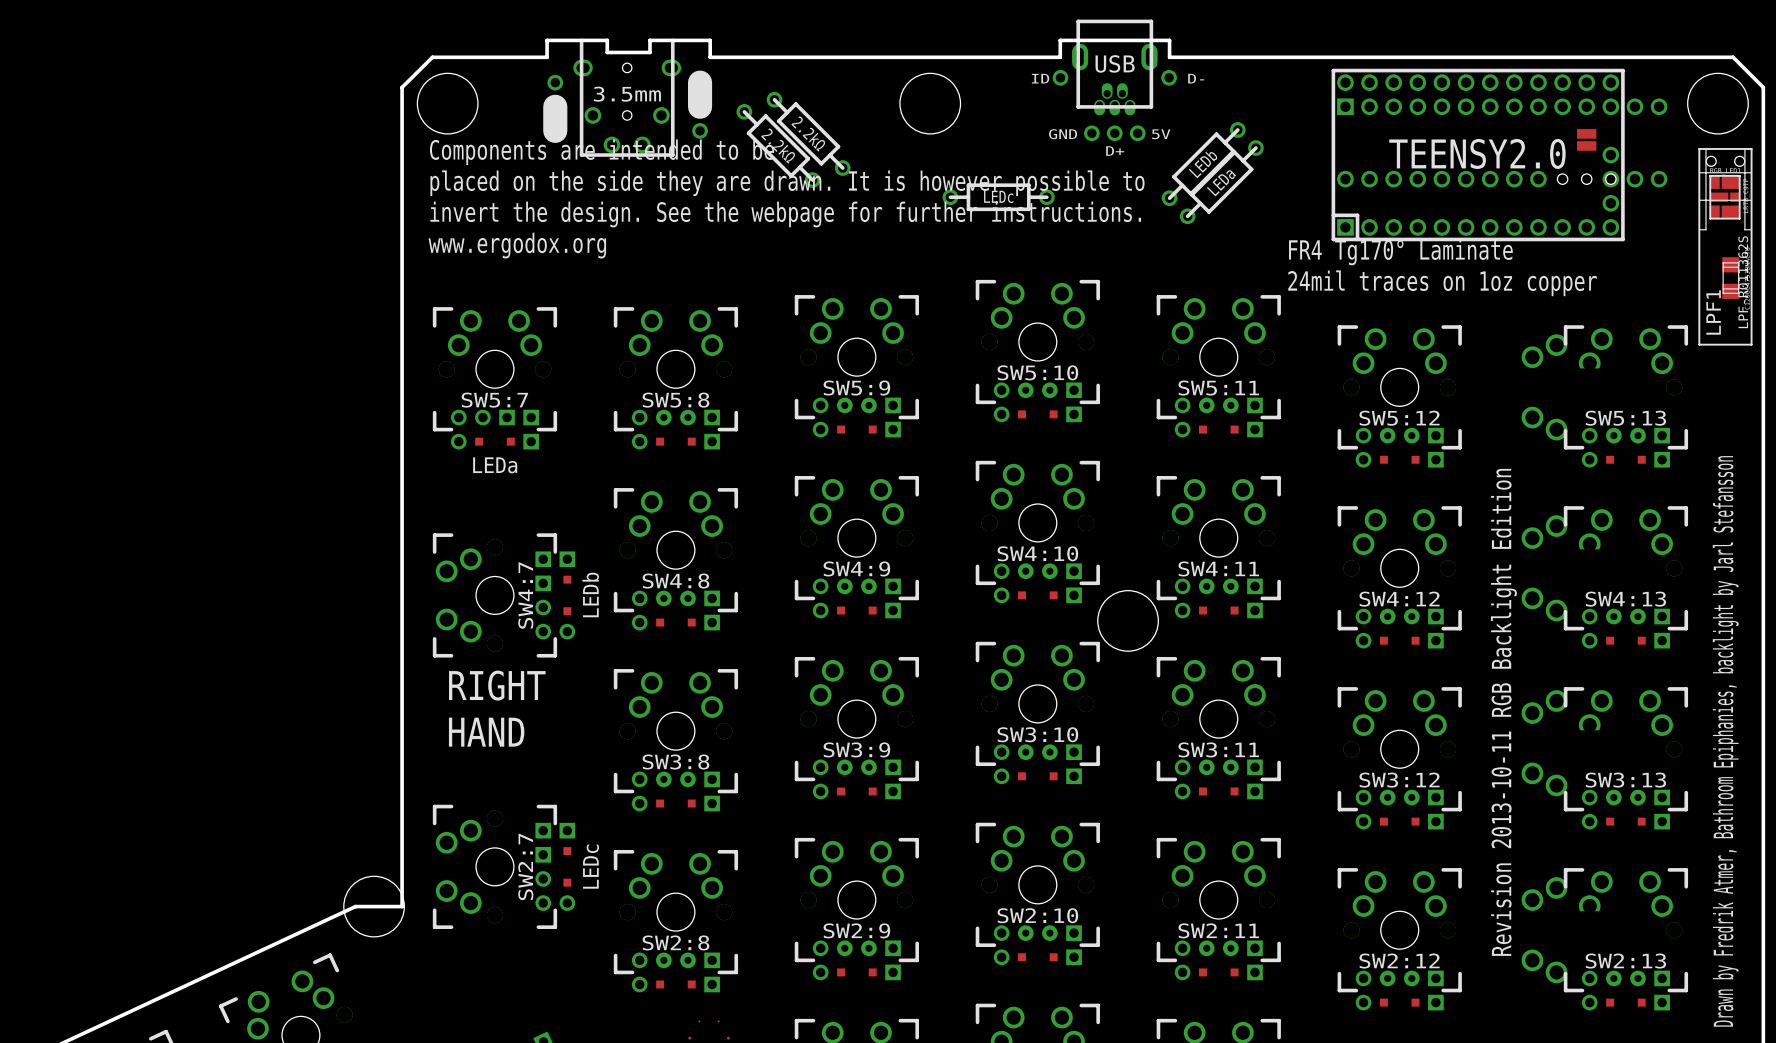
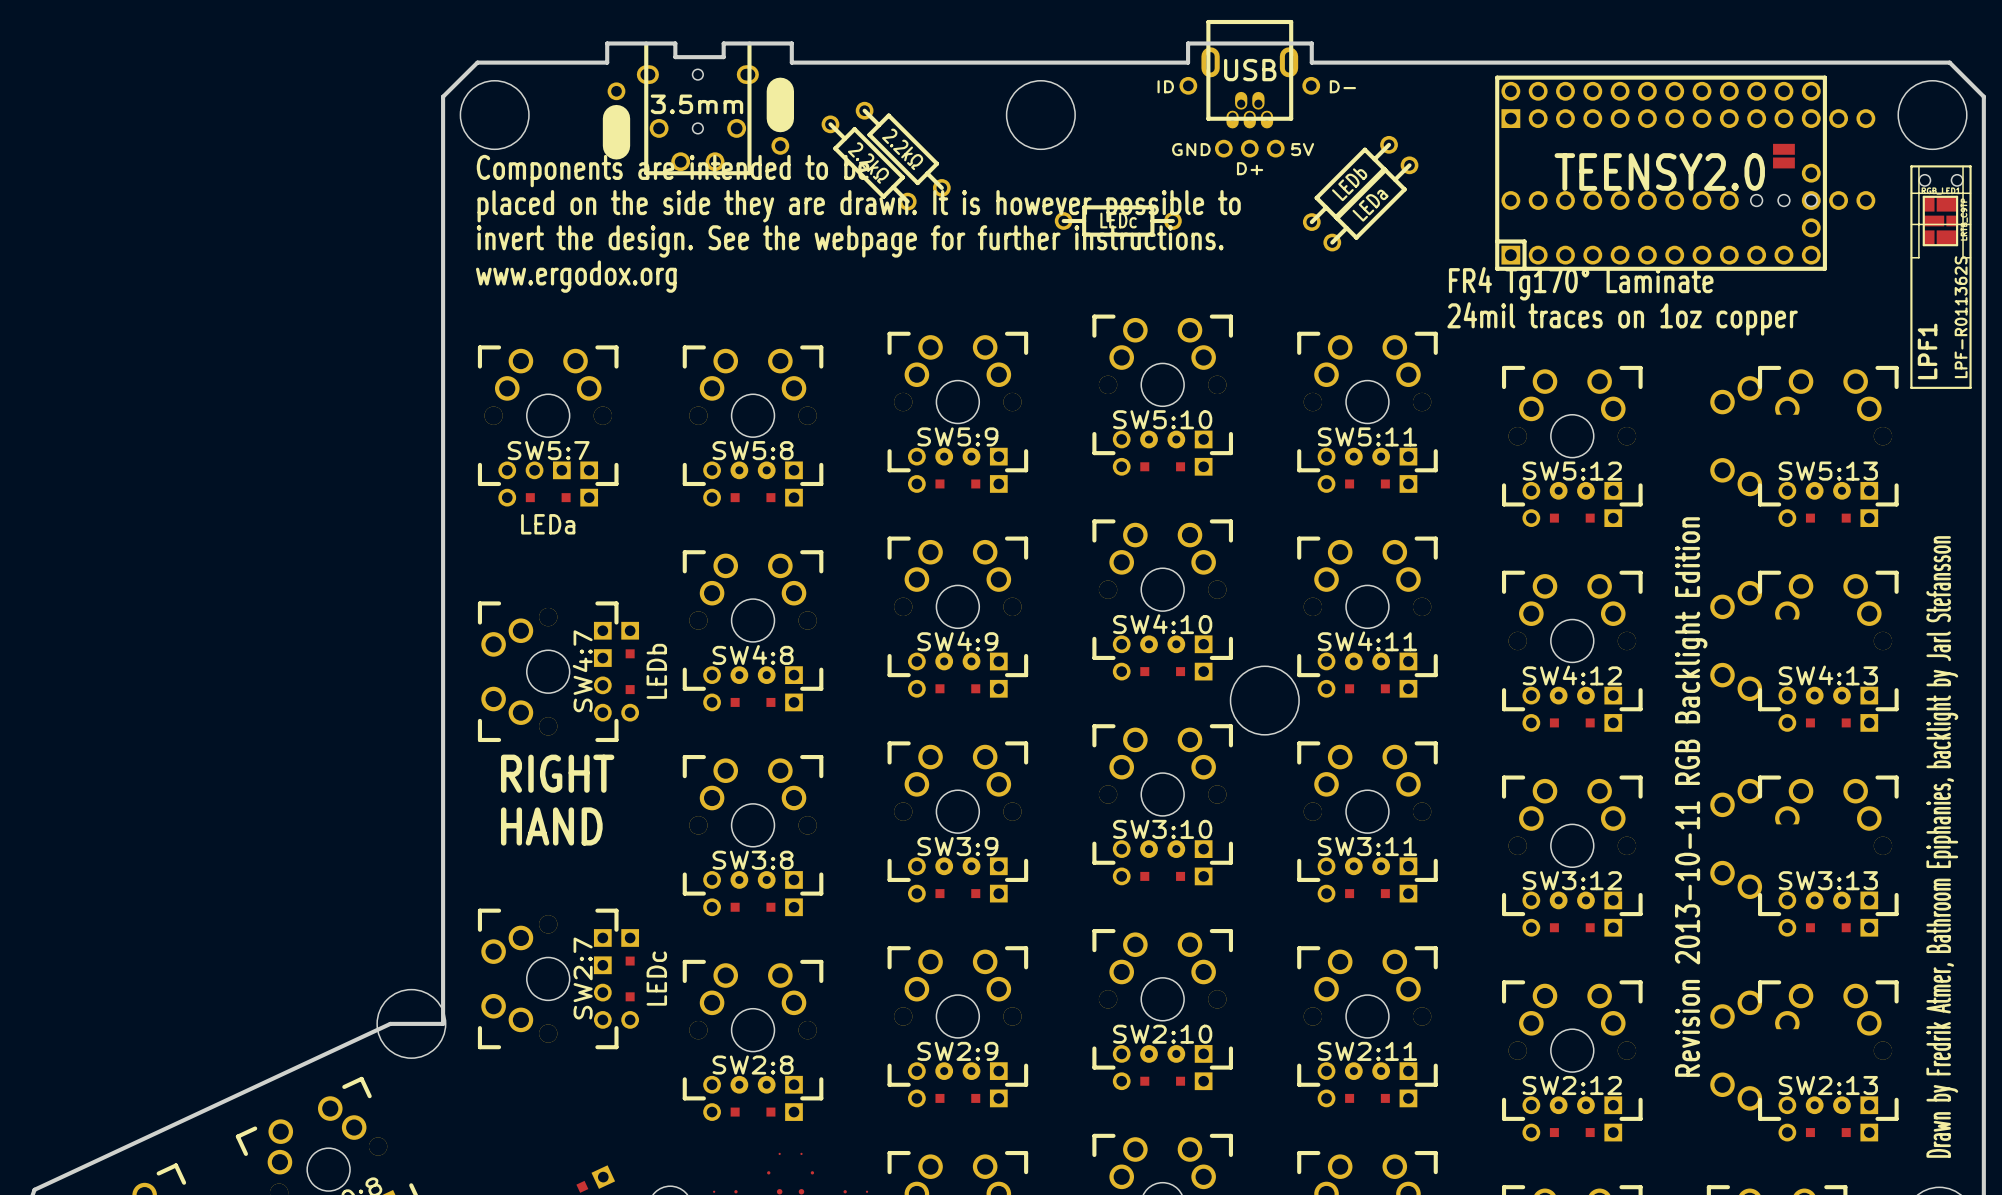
part: (1730, 278) -> none

